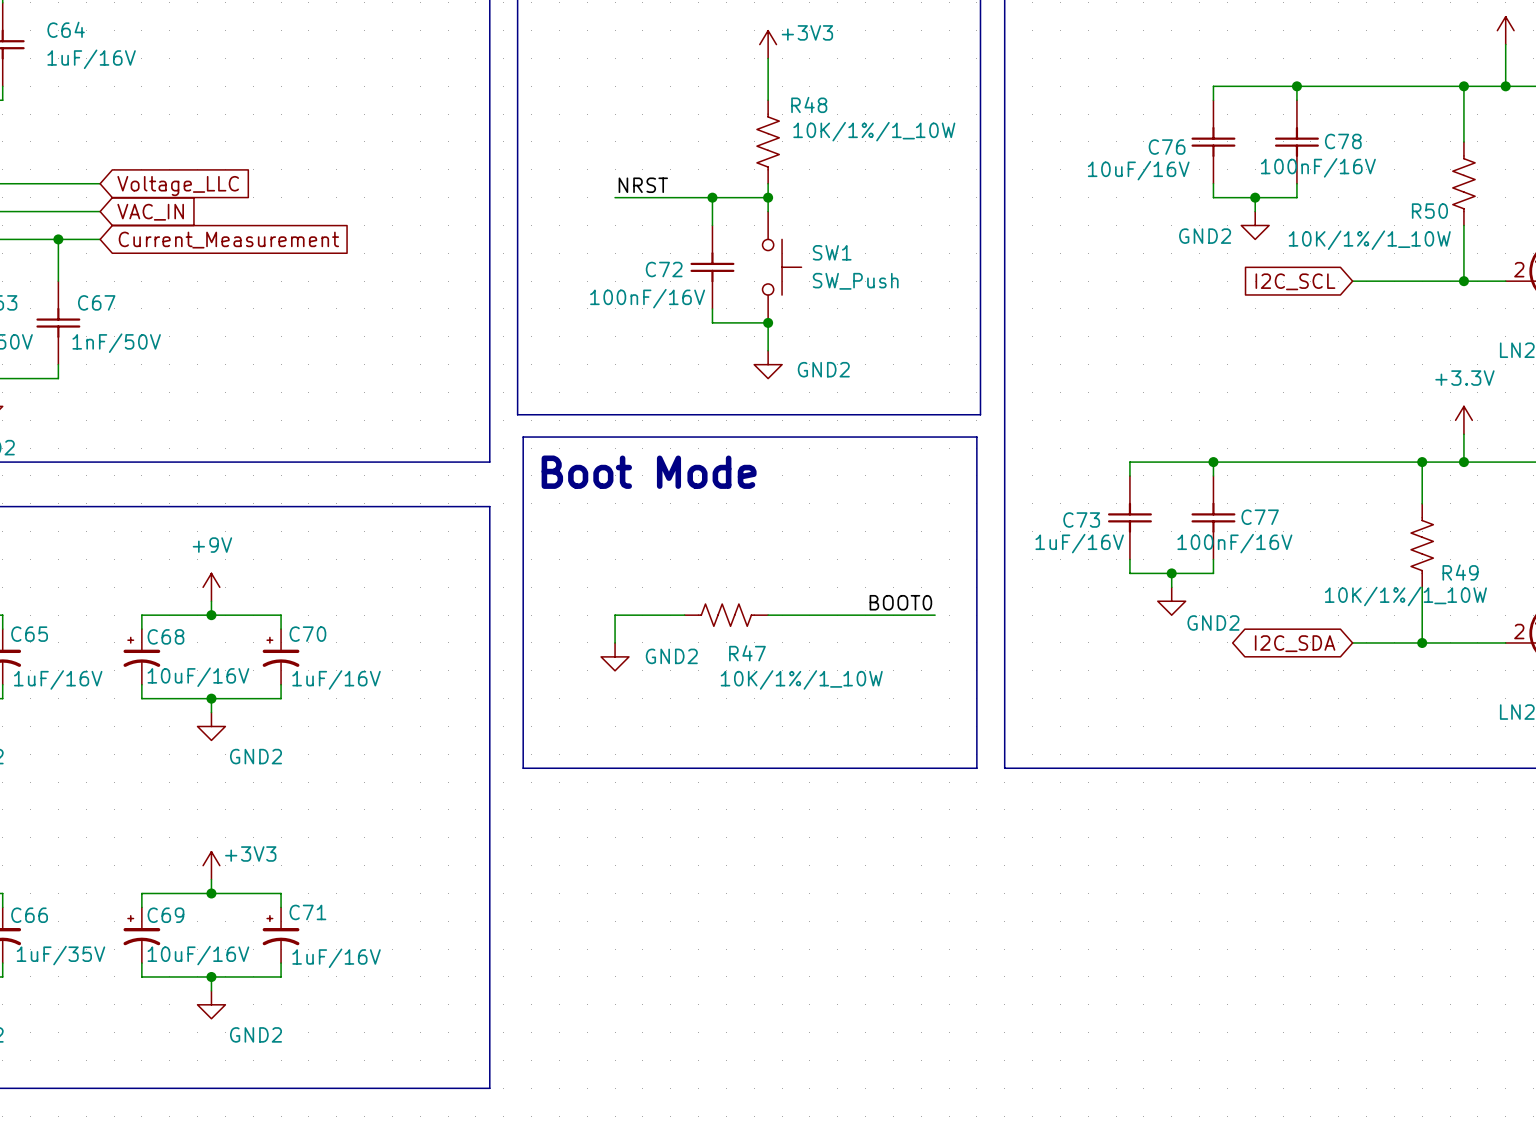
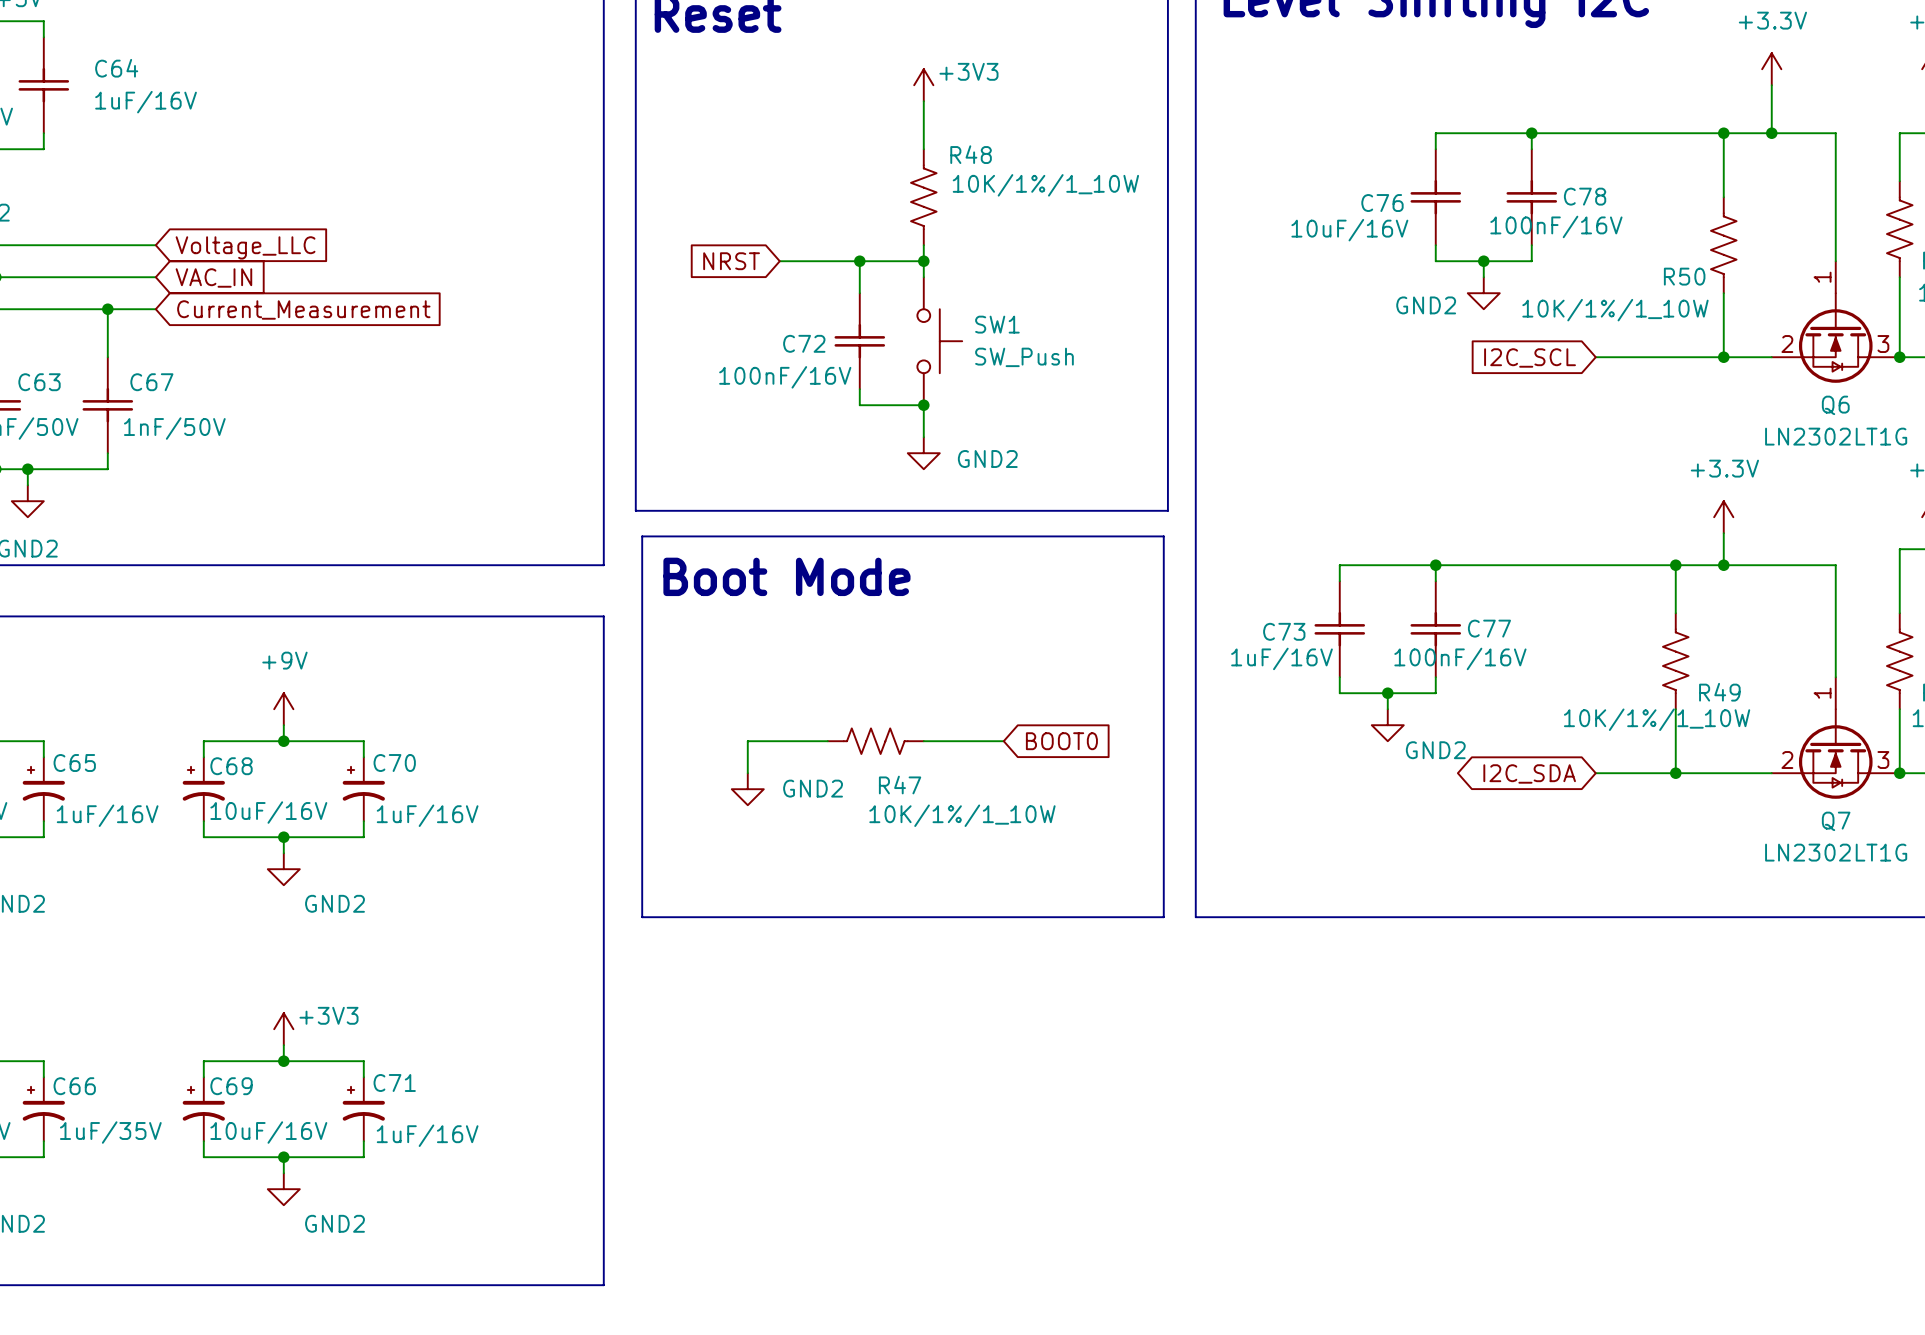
label: NRST (643, 185) -> none
global label: none -> NRST (731, 261)
wire: (615, 197) (642, 197) -> none
label: BOOT0 (900, 602) -> none
wire: (837, 615) (935, 615) -> none
global label: none -> BOOT0 (1061, 741)

